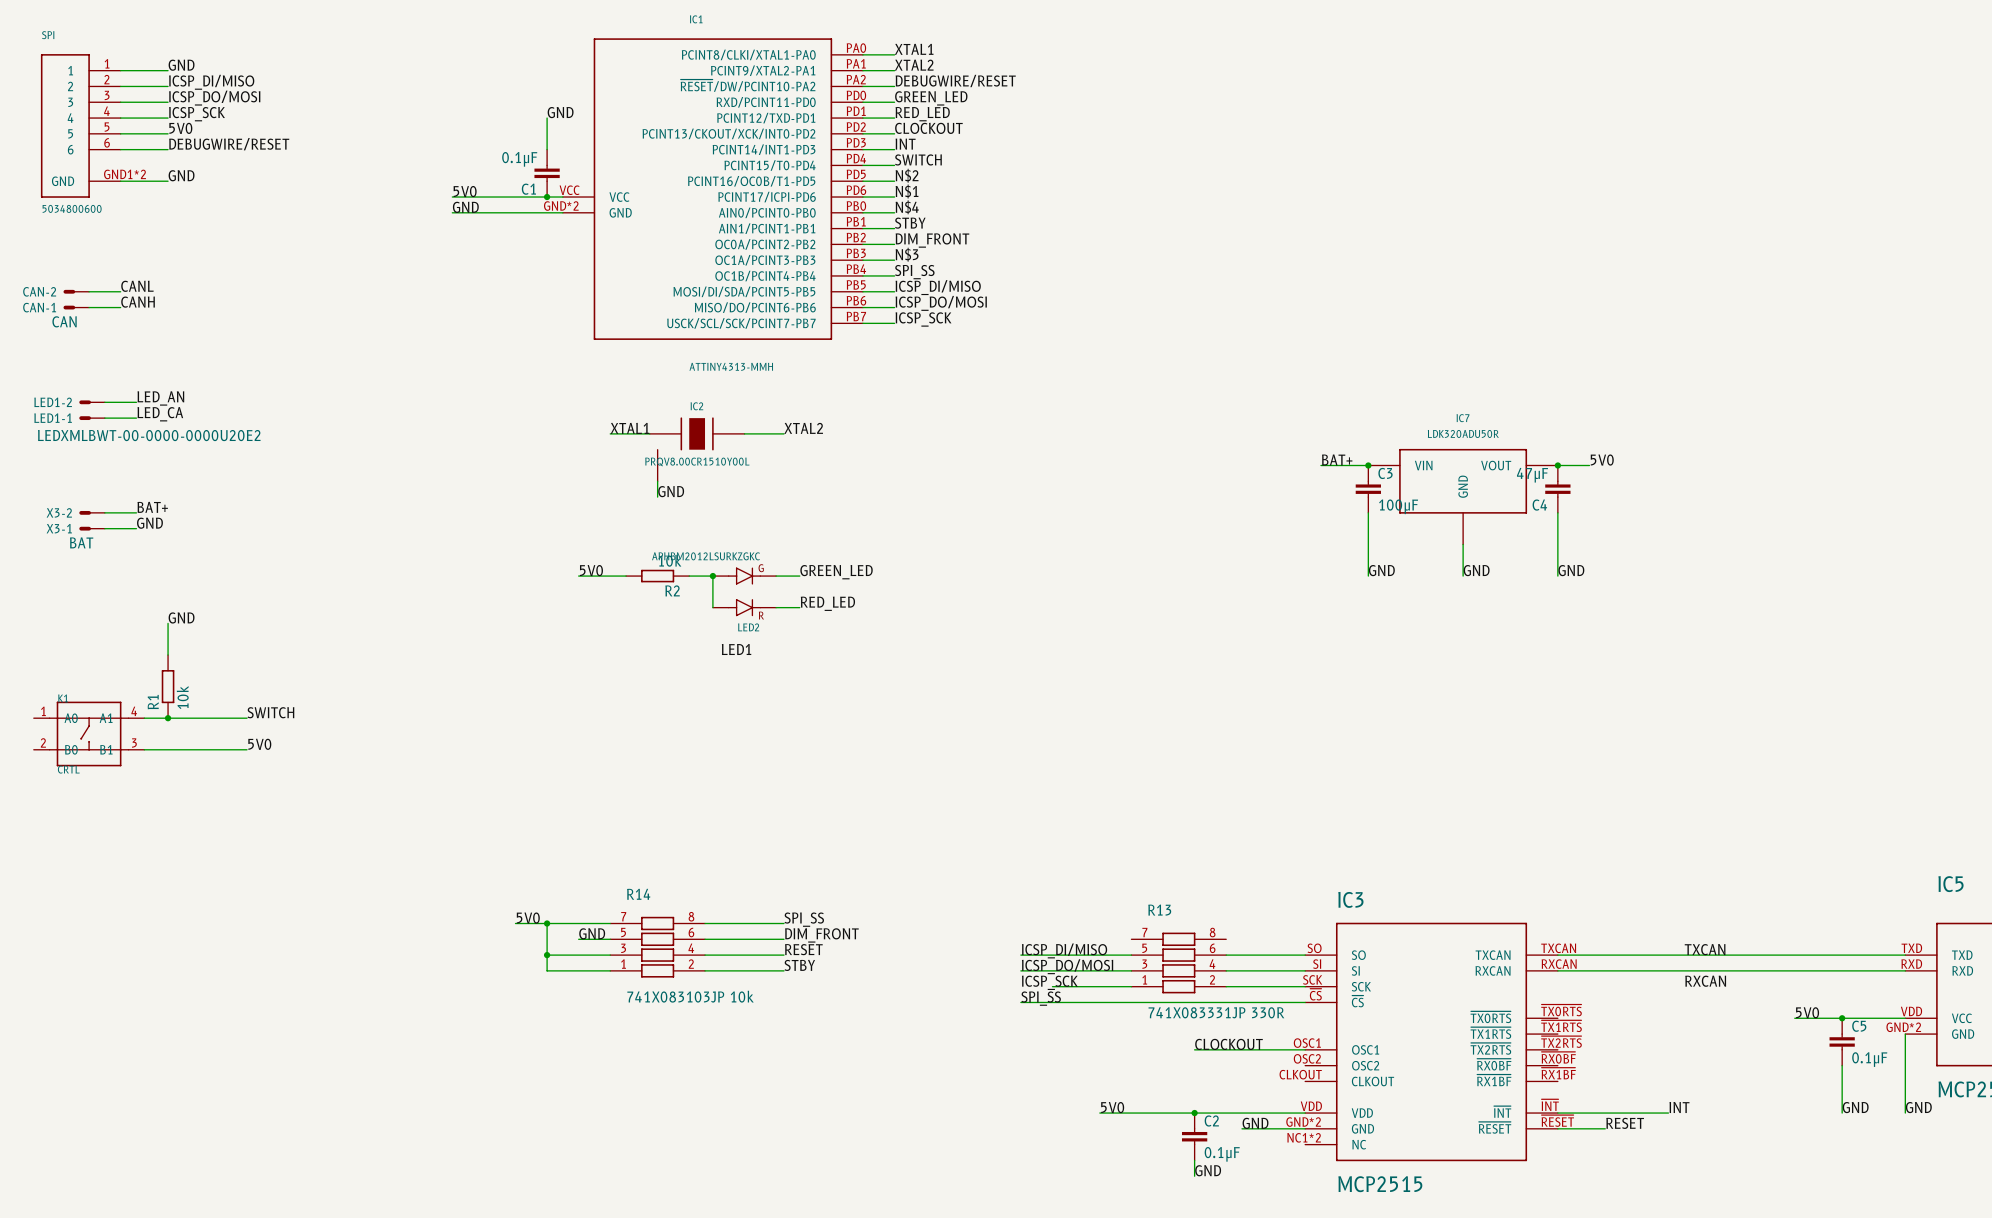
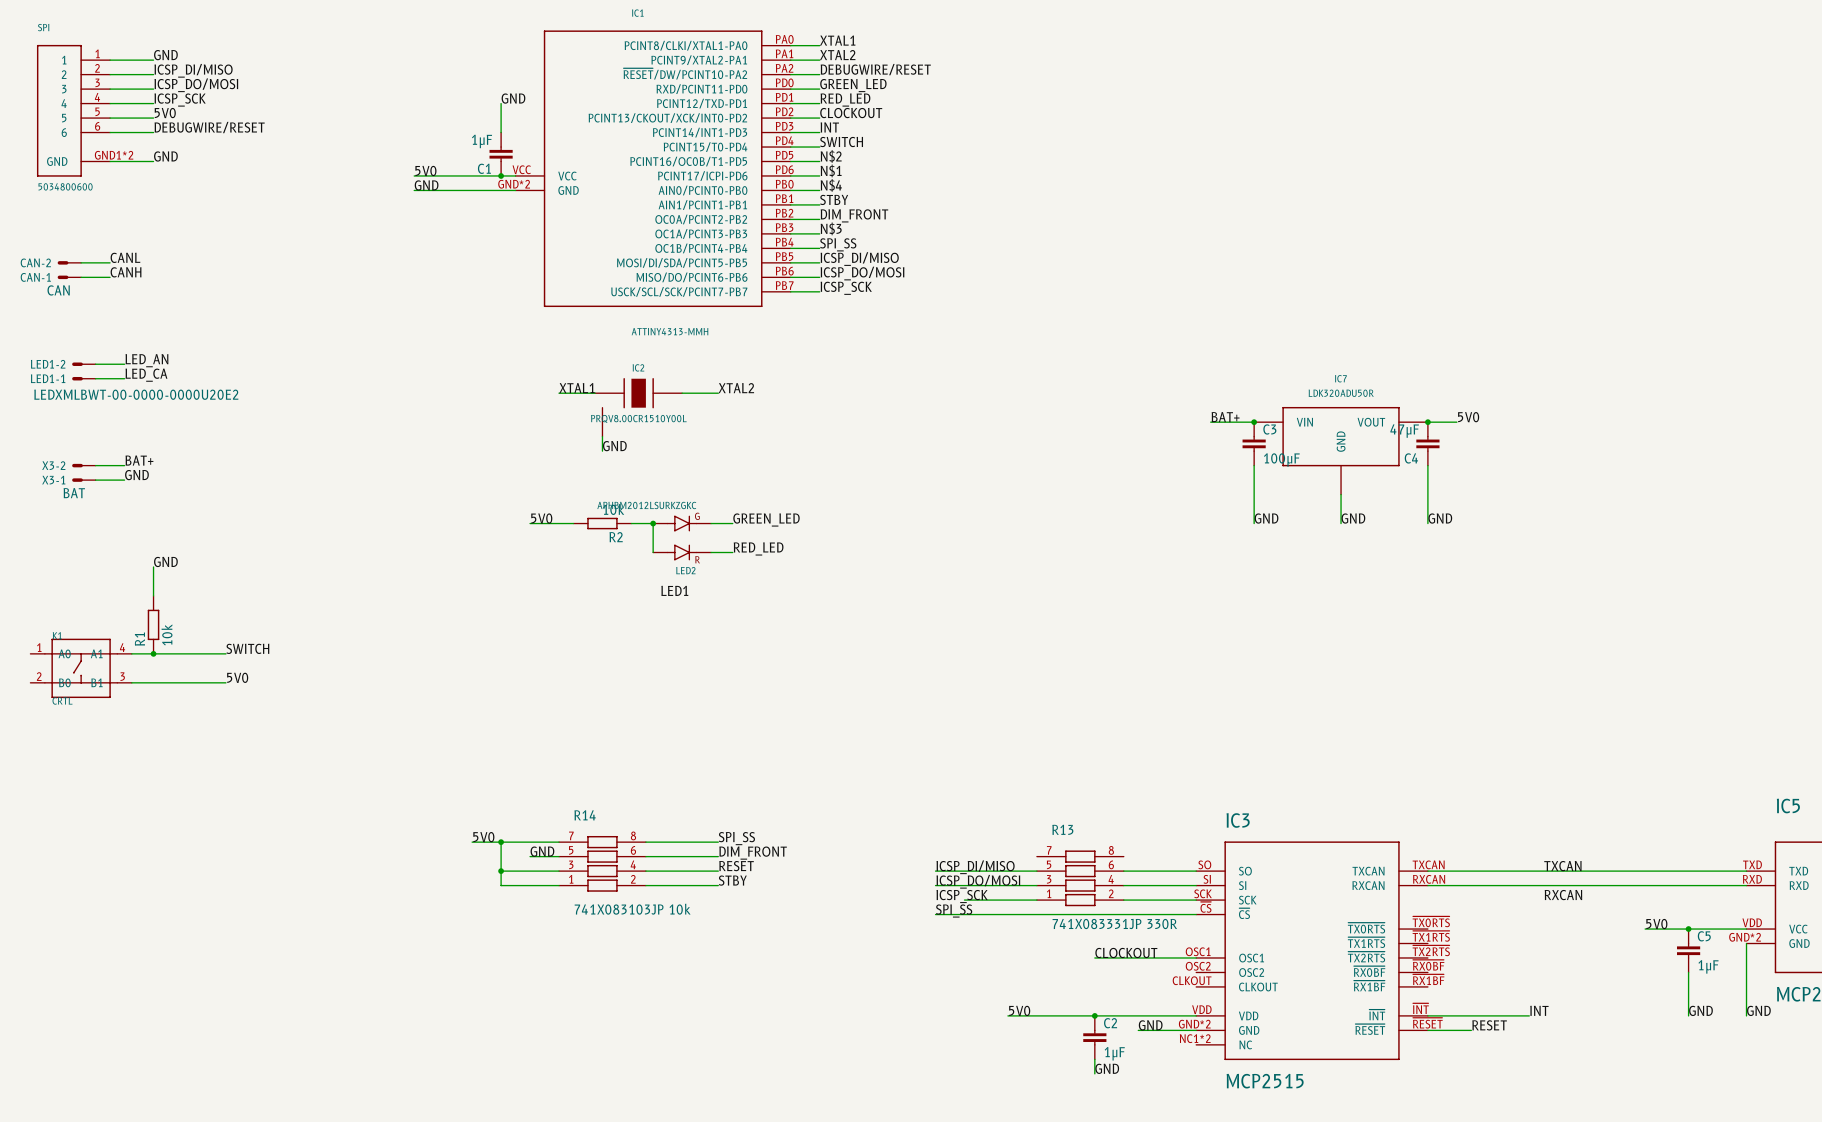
C1 value: 0.1μF (519, 159) -> 1μF (482, 141)
C5 value: 0.1μF (1869, 1059) -> 1μF (1708, 966)
C2 value: 0.1μF (1222, 1154) -> 1μF (1114, 1053)

